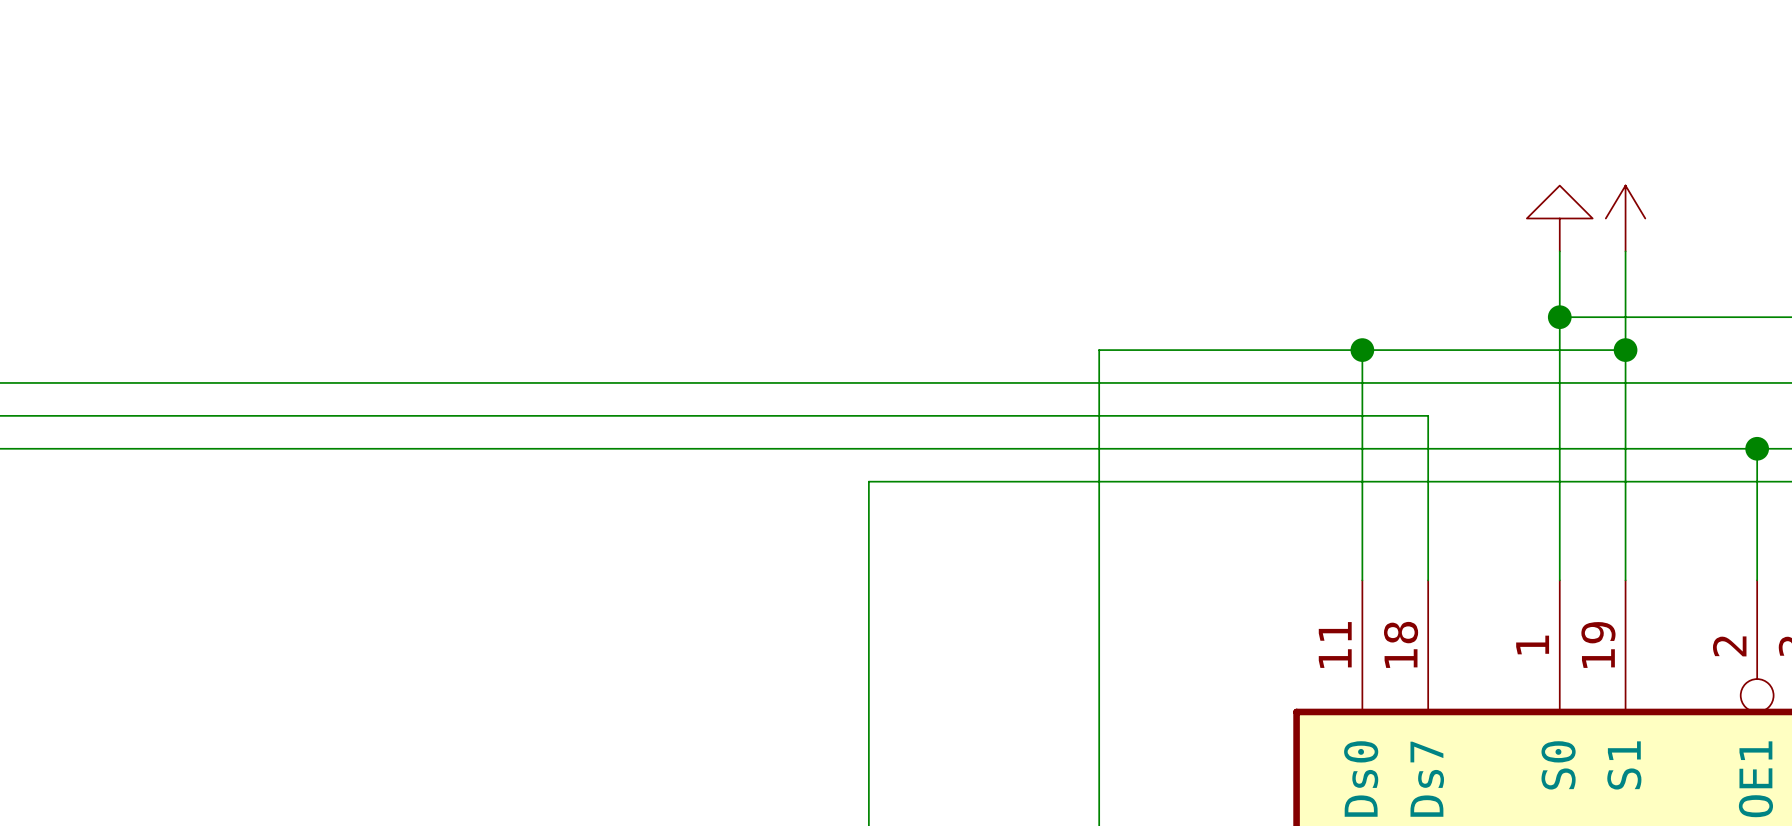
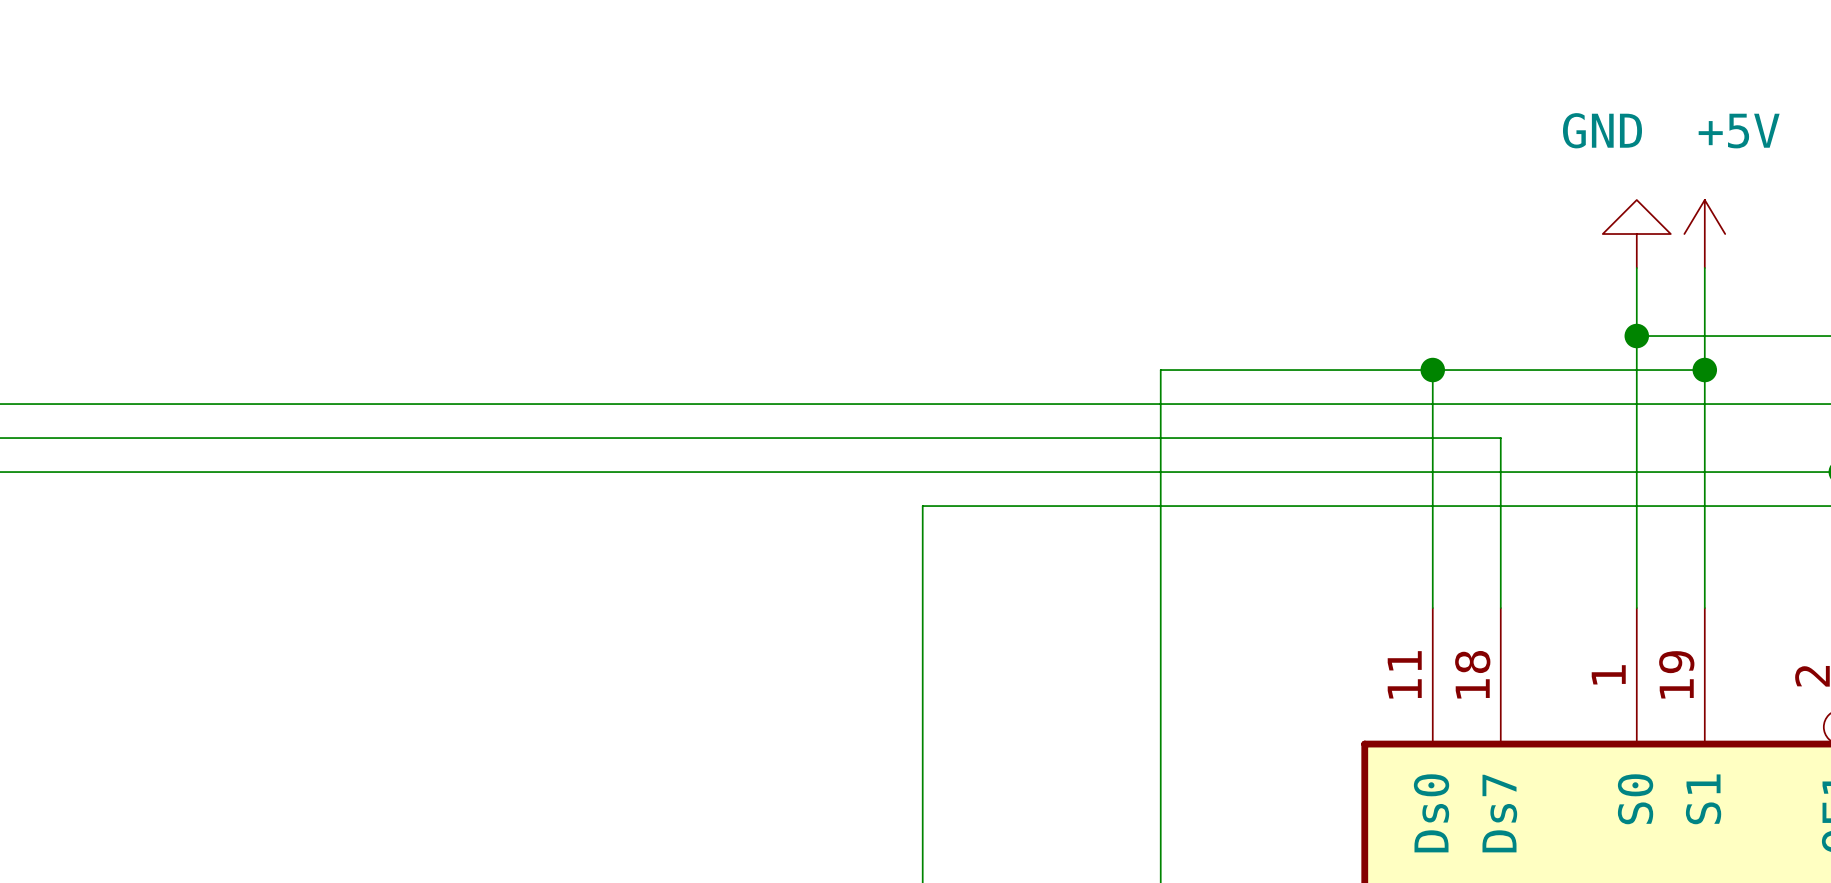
power symbol text: none -> GND (1602, 130)
power symbol text: none -> +5V (1739, 131)

